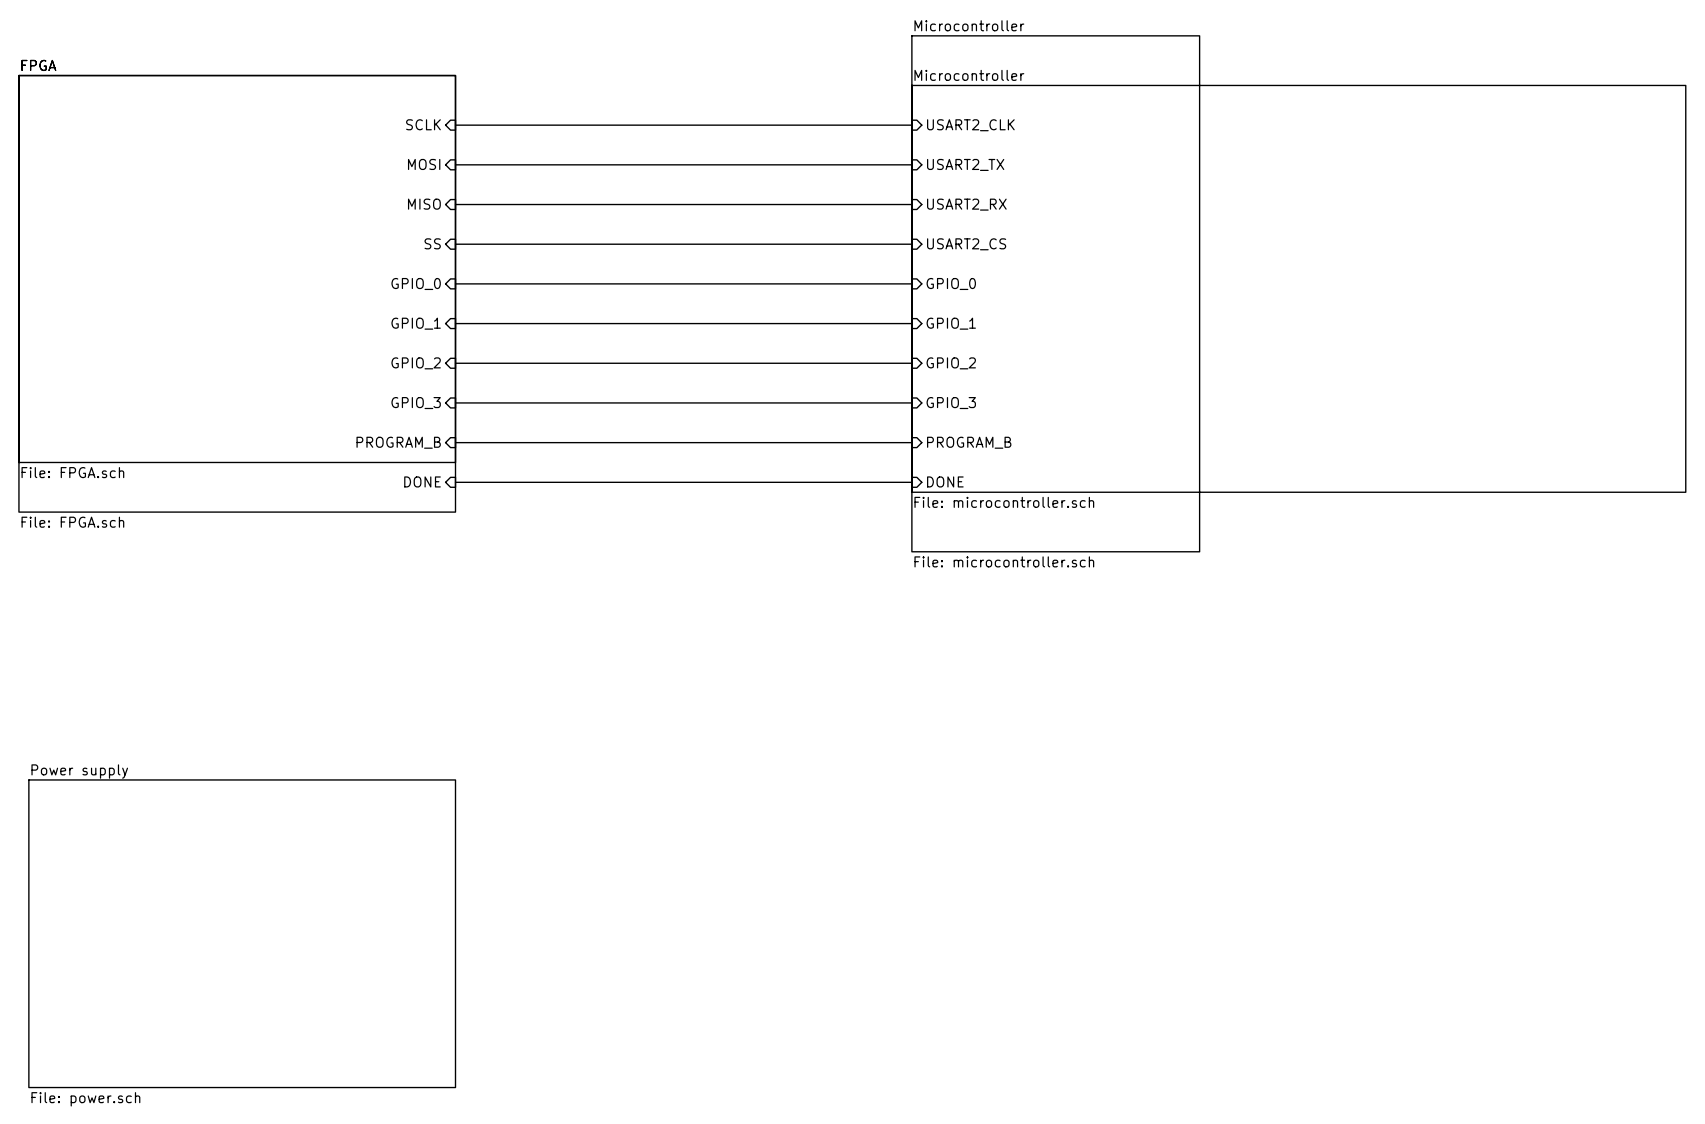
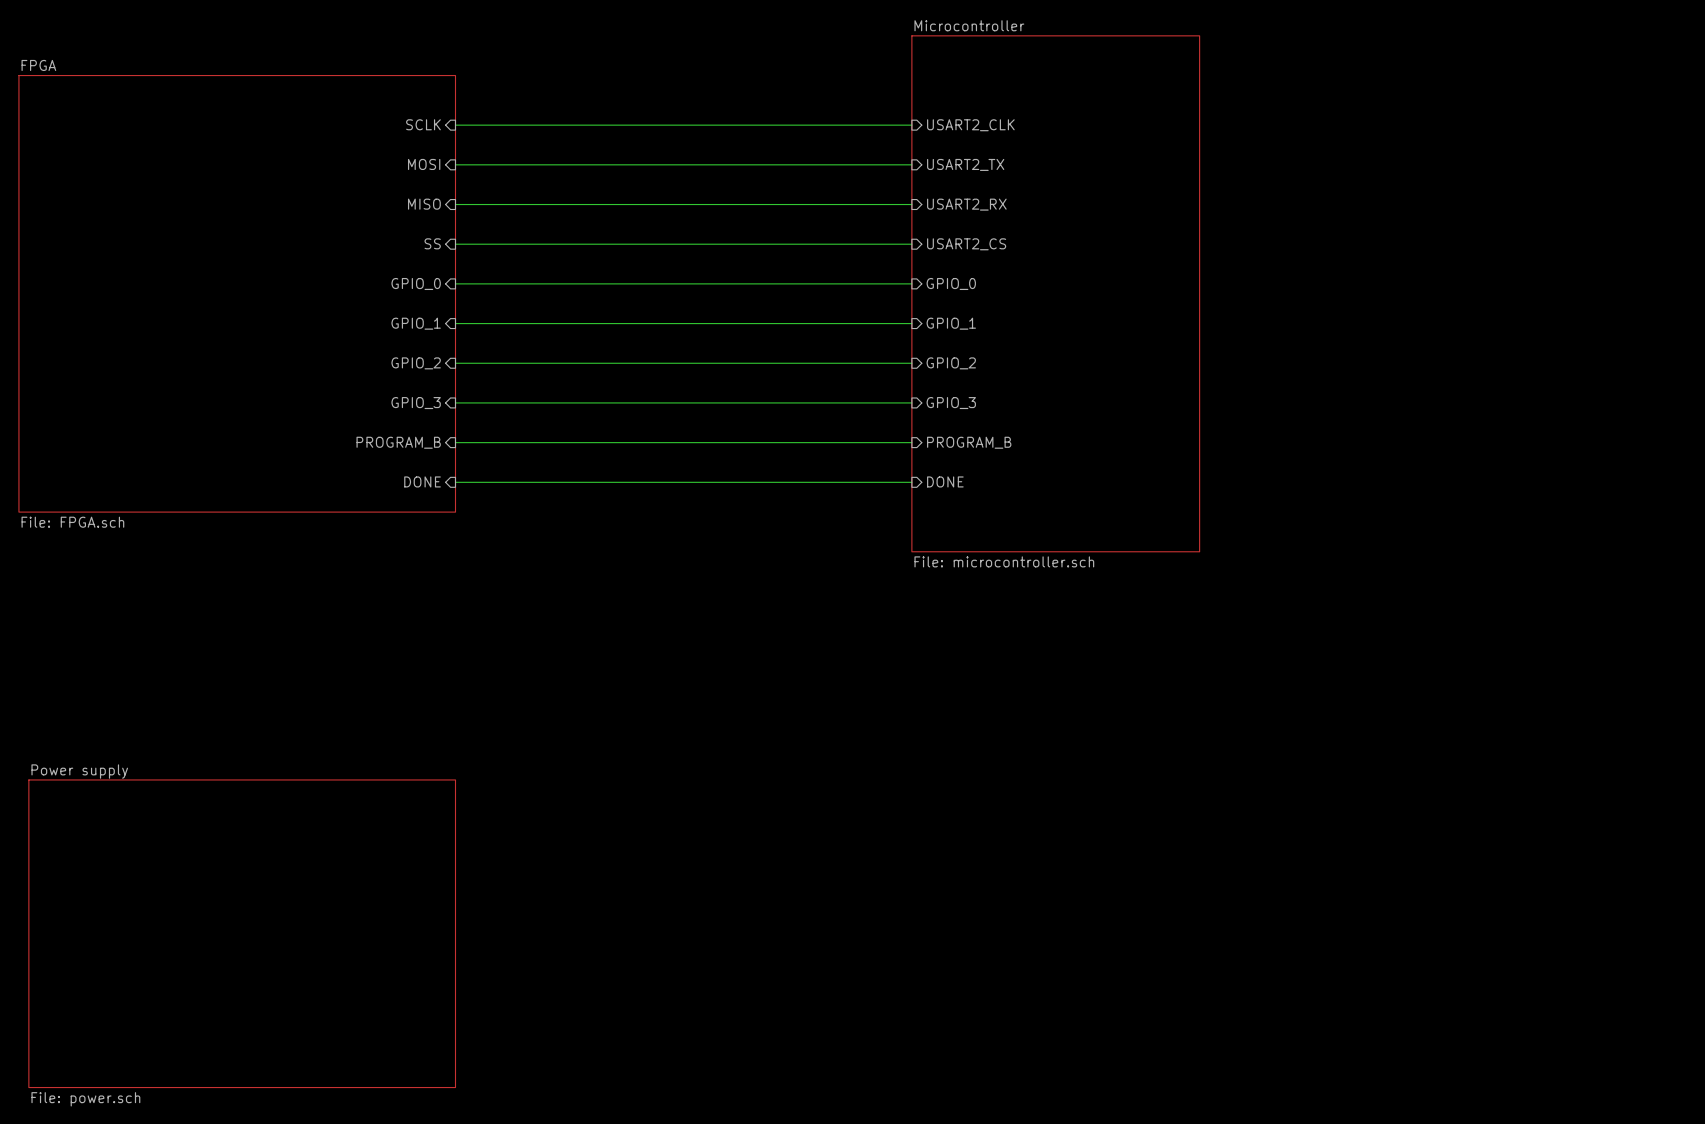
sheet FPGA: File: FPGA.sch (237, 269) -> none
sheet Microcontroller: File: microcontroller.sch (1298, 288) -> none

